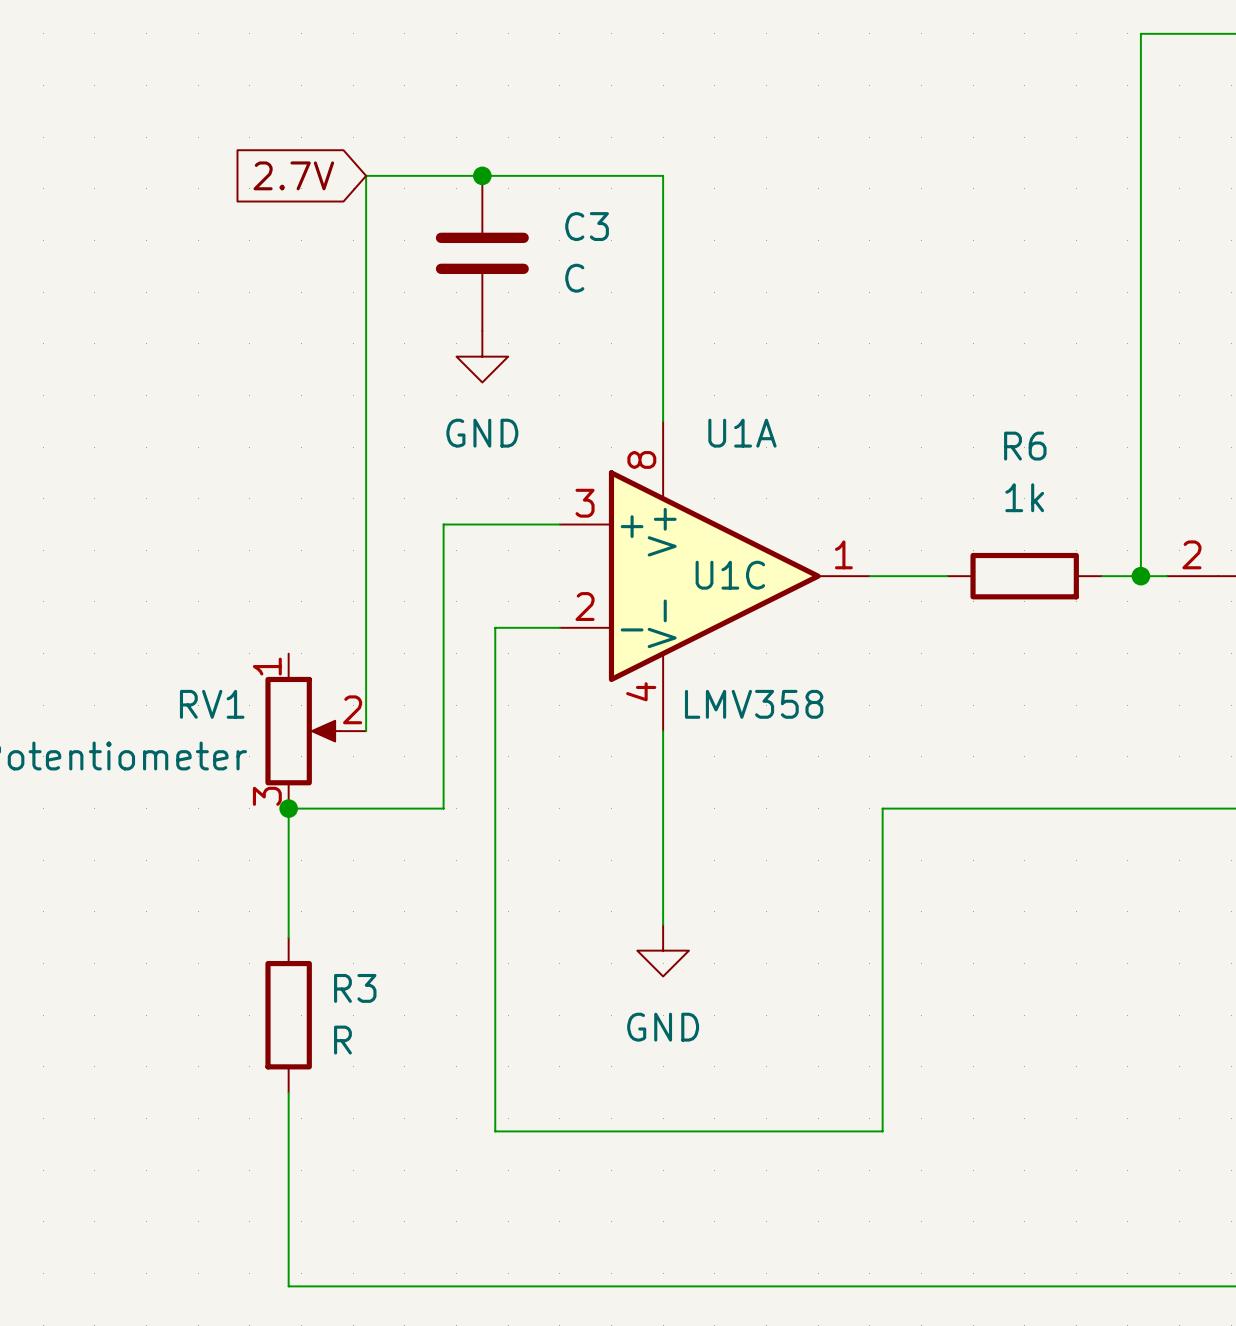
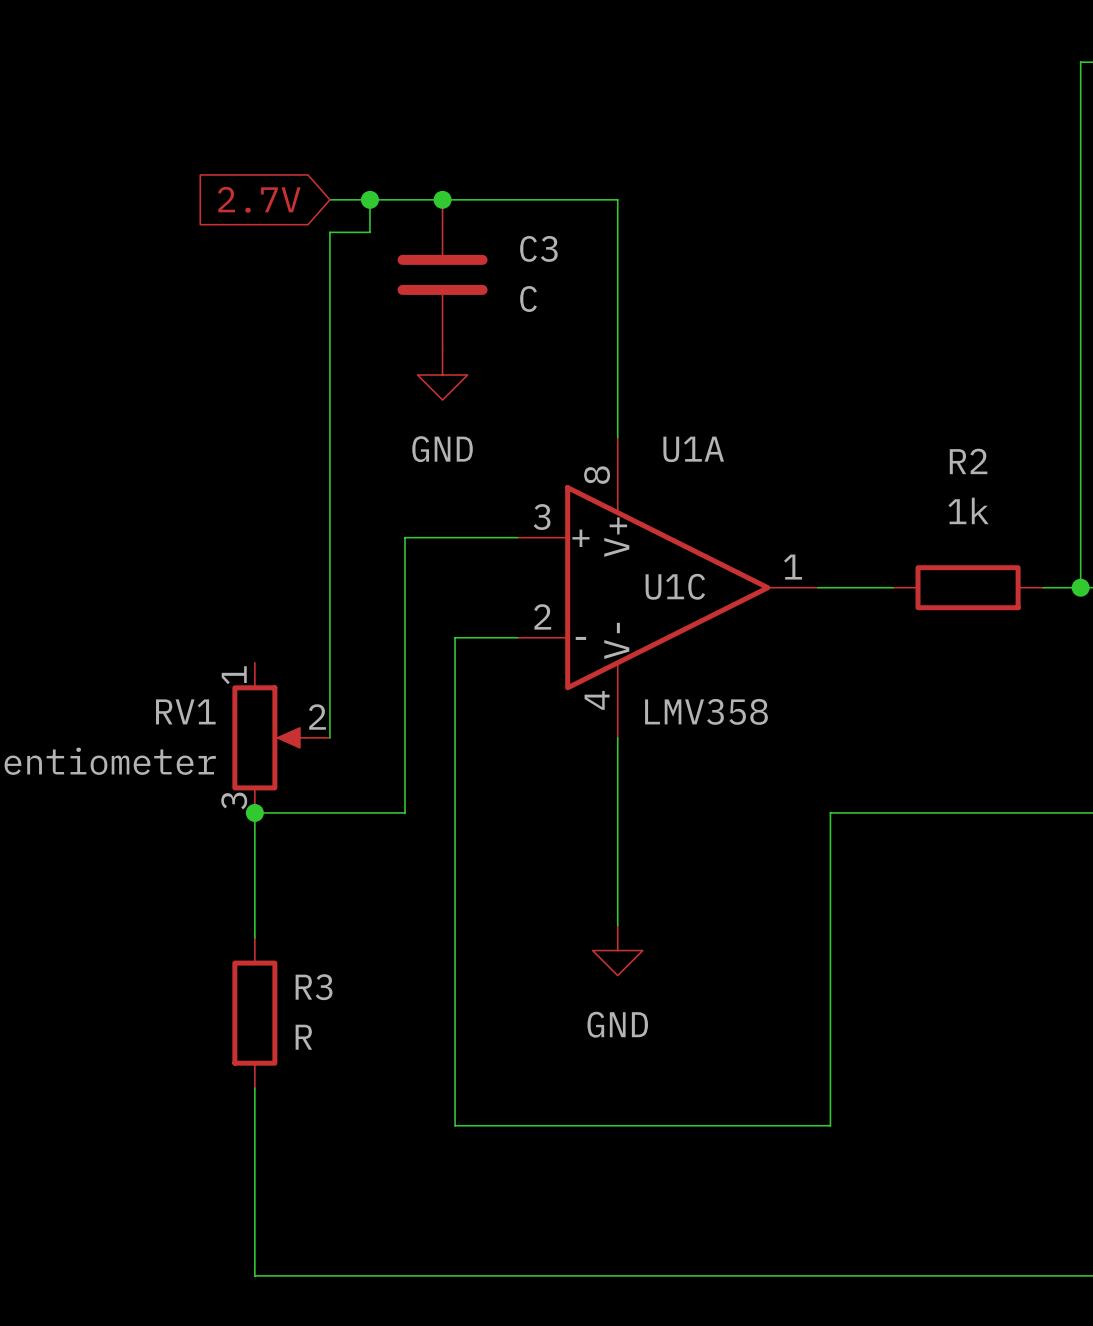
wire: (366, 175) (366, 209) -> (369, 199) (369, 232) (329, 232)
junction: none -> (369, 199)
R6 name: R6 (1025, 446) -> R2 (968, 461)

